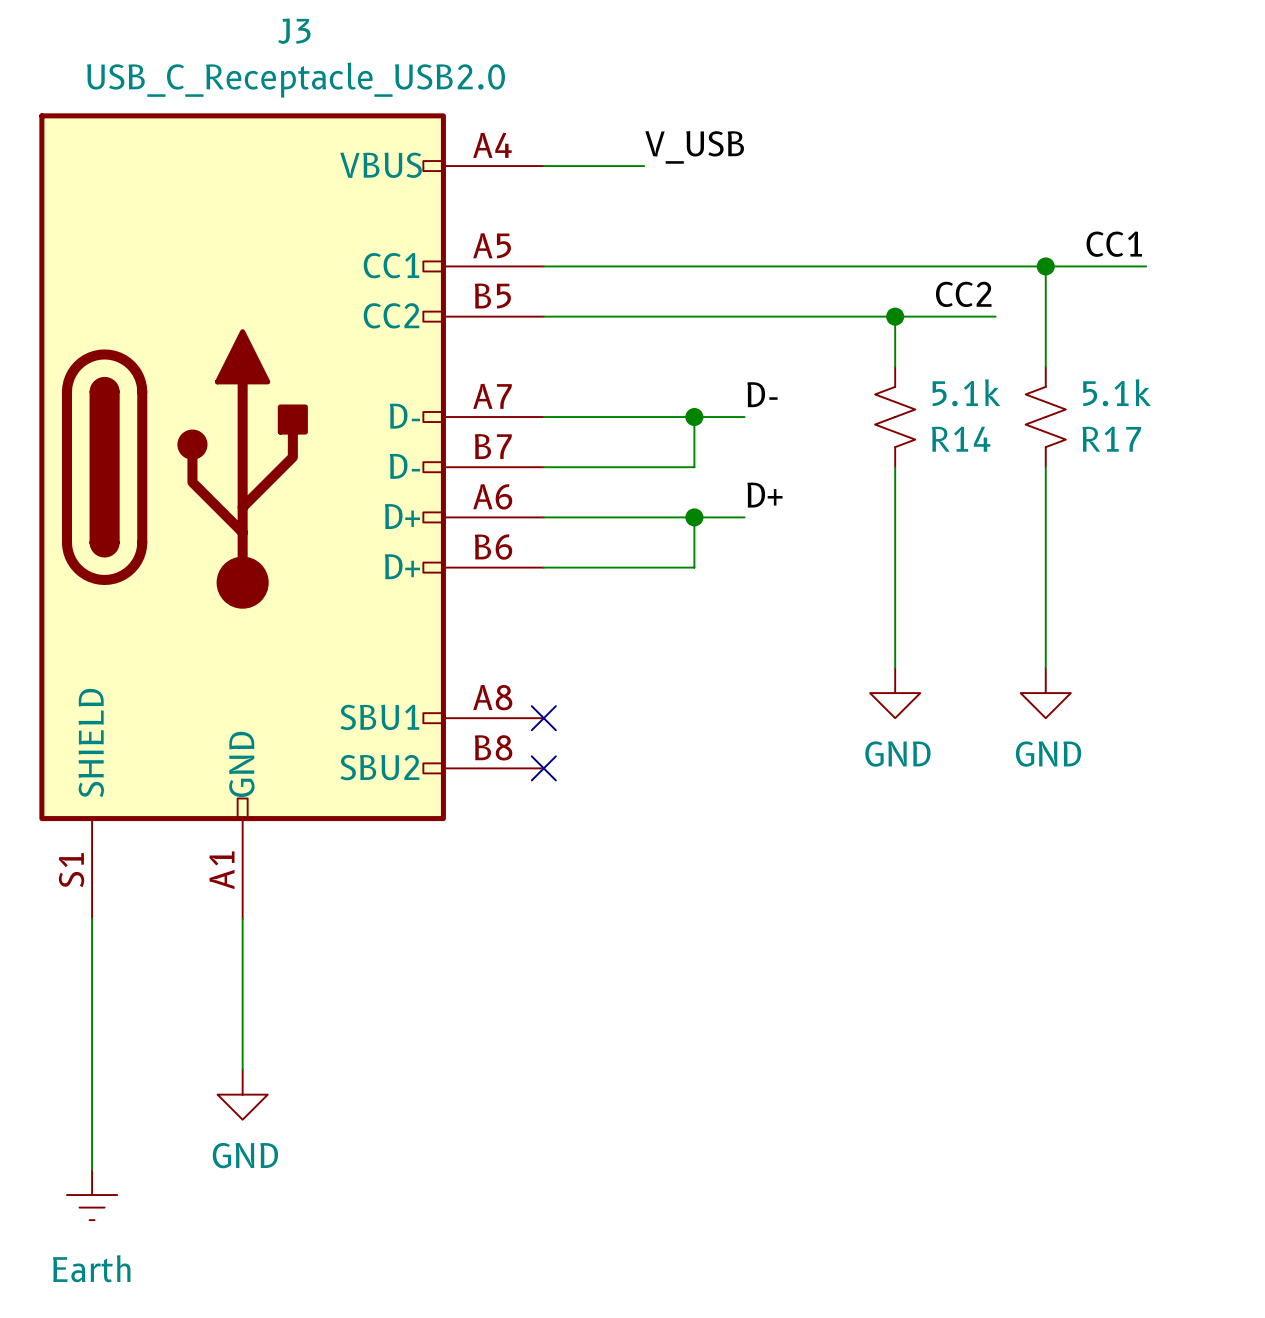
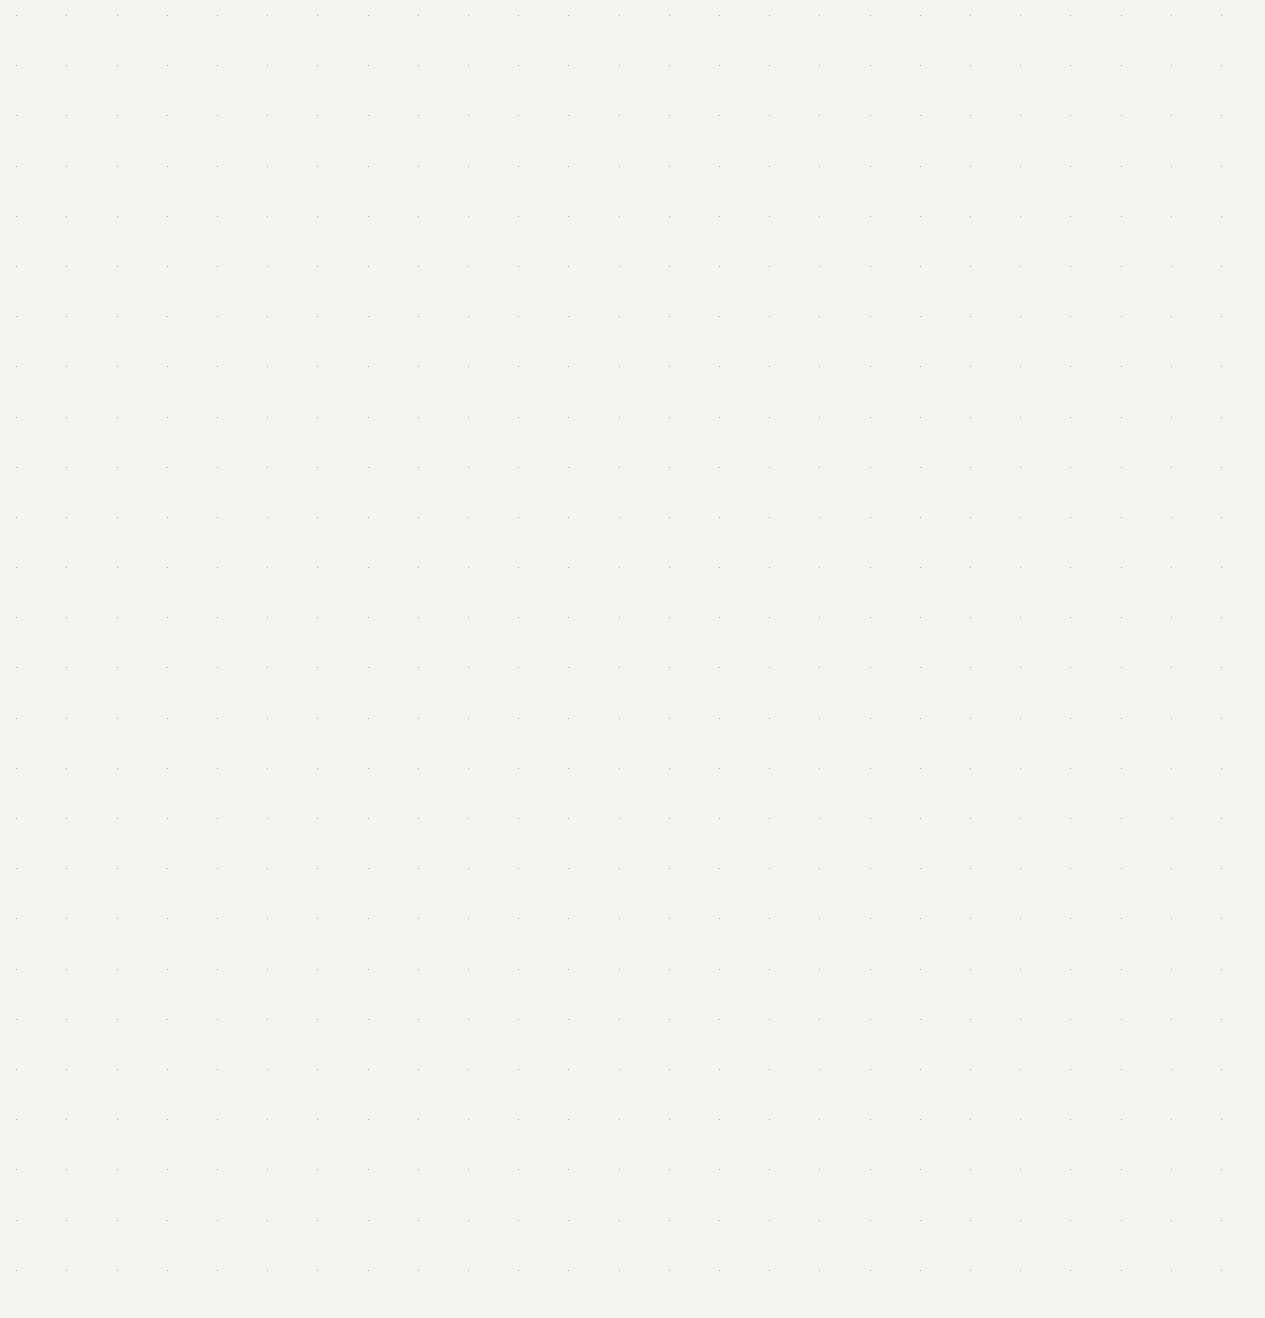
label: V_USB (694, 147) -> none
wire: (543, 166) (644, 166) -> none
label: CC1 (1114, 244) -> none
wire: (543, 266) (1146, 266) -> none
wire: (1045, 266) (1045, 366) -> none
junction: (1045, 266) -> none
label: CC2 (963, 294) -> none
wire: (543, 316) (995, 316) -> none
wire: (895, 316) (895, 366) -> none
junction: (895, 316) -> none
label: D- (762, 394) -> none
wire: (543, 417) (744, 417) -> none
wire: (694, 417) (694, 467) (543, 467) -> none
junction: (694, 417) -> none
R14: 5.1k (895, 417) -> none
R17: 5.1k (1045, 417) -> none
wire: (895, 467) (895, 667) -> none
wire: (1045, 467) (1045, 667) -> none
label: D+ (764, 495) -> none
J3: USB_C_Receptacle_USB2.0 (291, 516) -> none
wire: (543, 517) (744, 517) -> none
wire: (694, 517) (694, 567) (543, 567) -> none
junction: (694, 517) -> none
power symbol: GND (895, 693) -> none
power symbol: GND (1045, 693) -> none
no-connect mark: (543, 718) -> none
no-connect mark: (543, 768) -> none
wire: (92, 918) (92, 1169) -> none
wire: (242, 918) (242, 1069) -> none
power symbol: GND (242, 1094) -> none
power symbol: Earth (92, 1195) -> none

